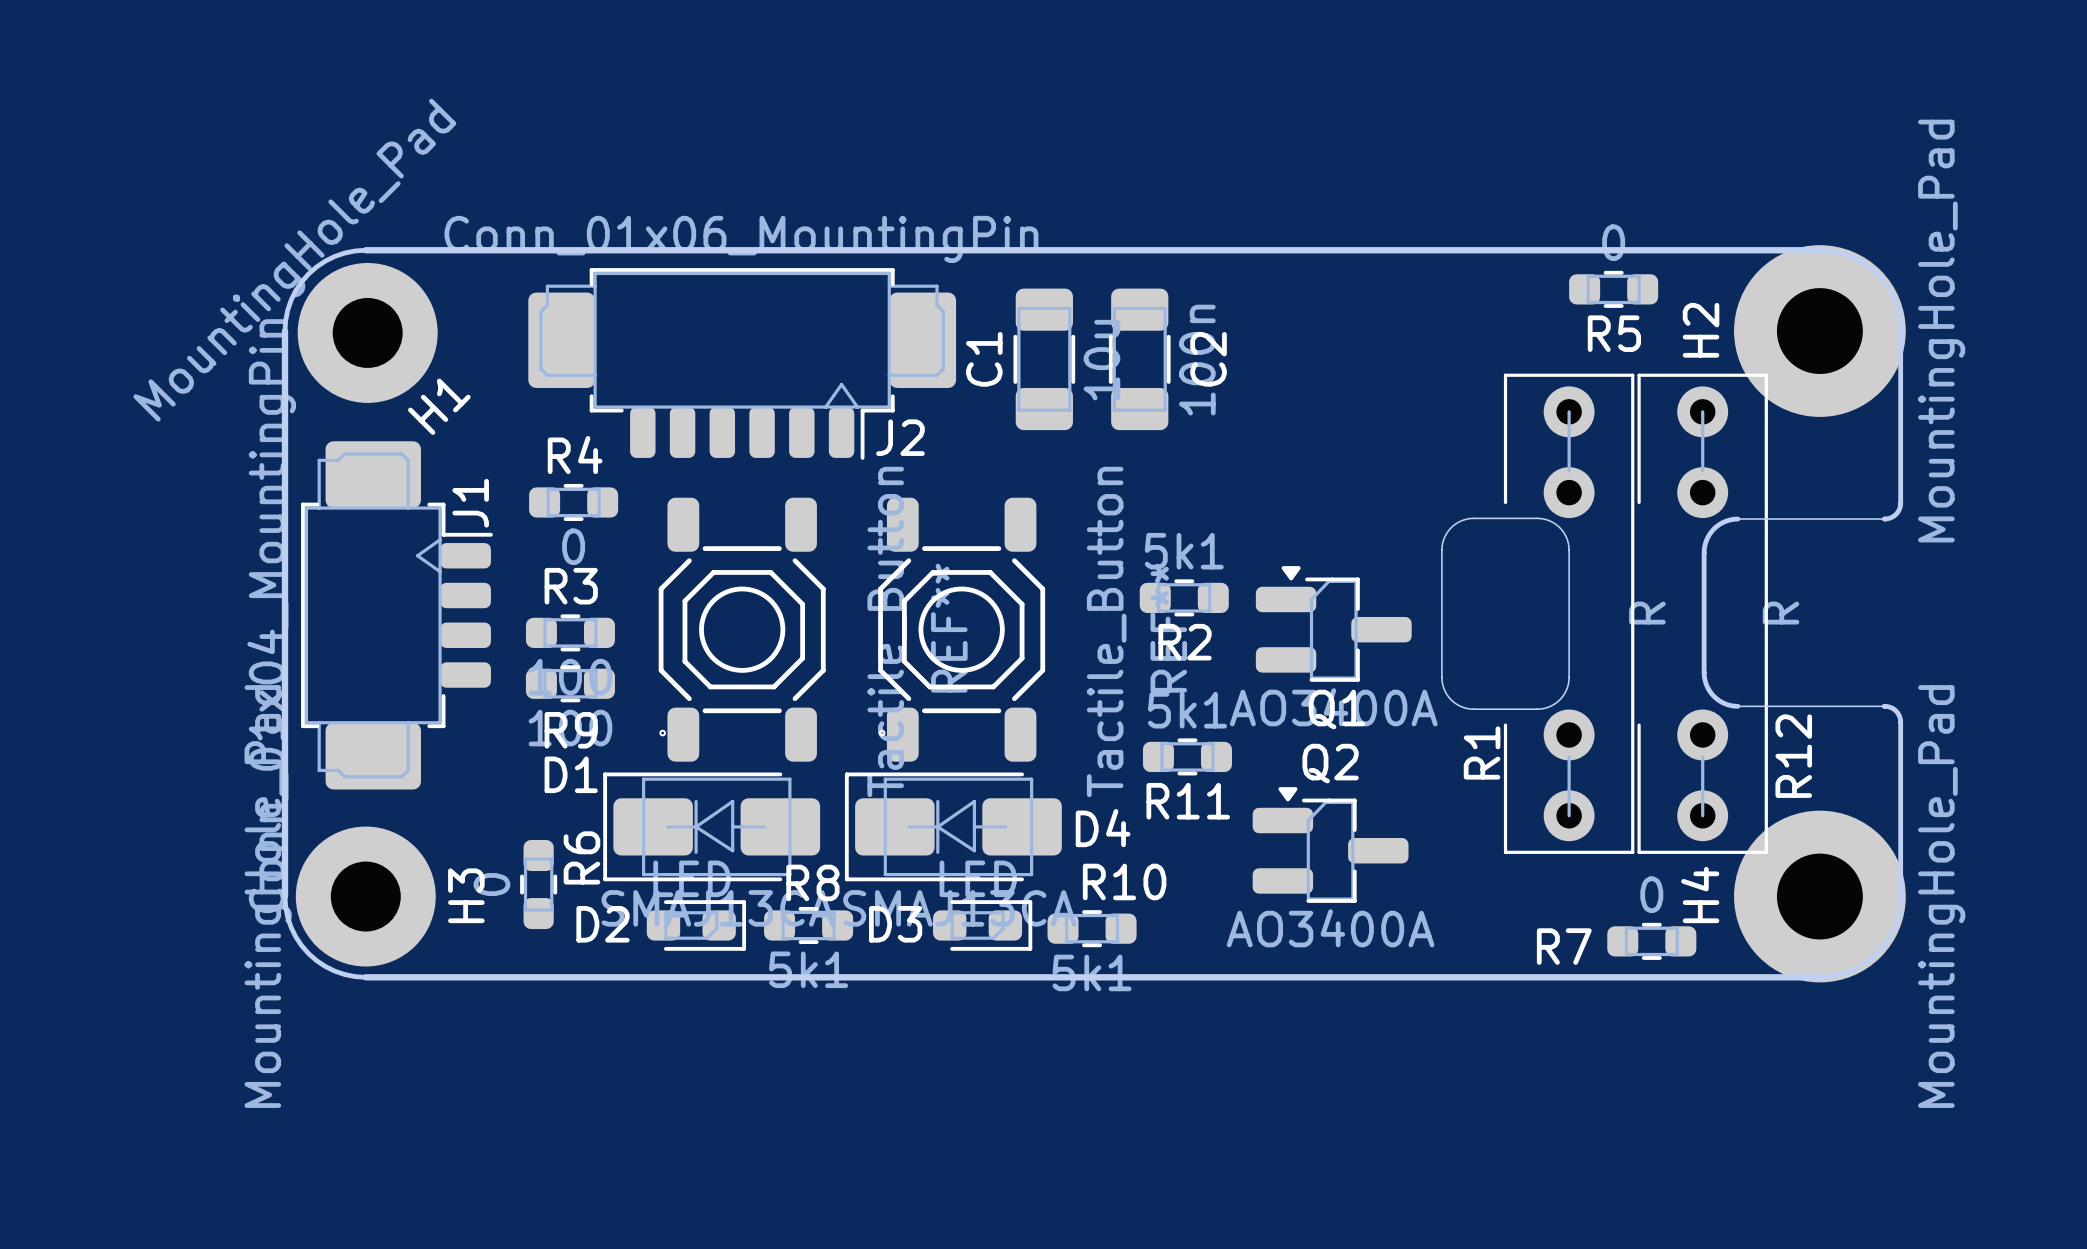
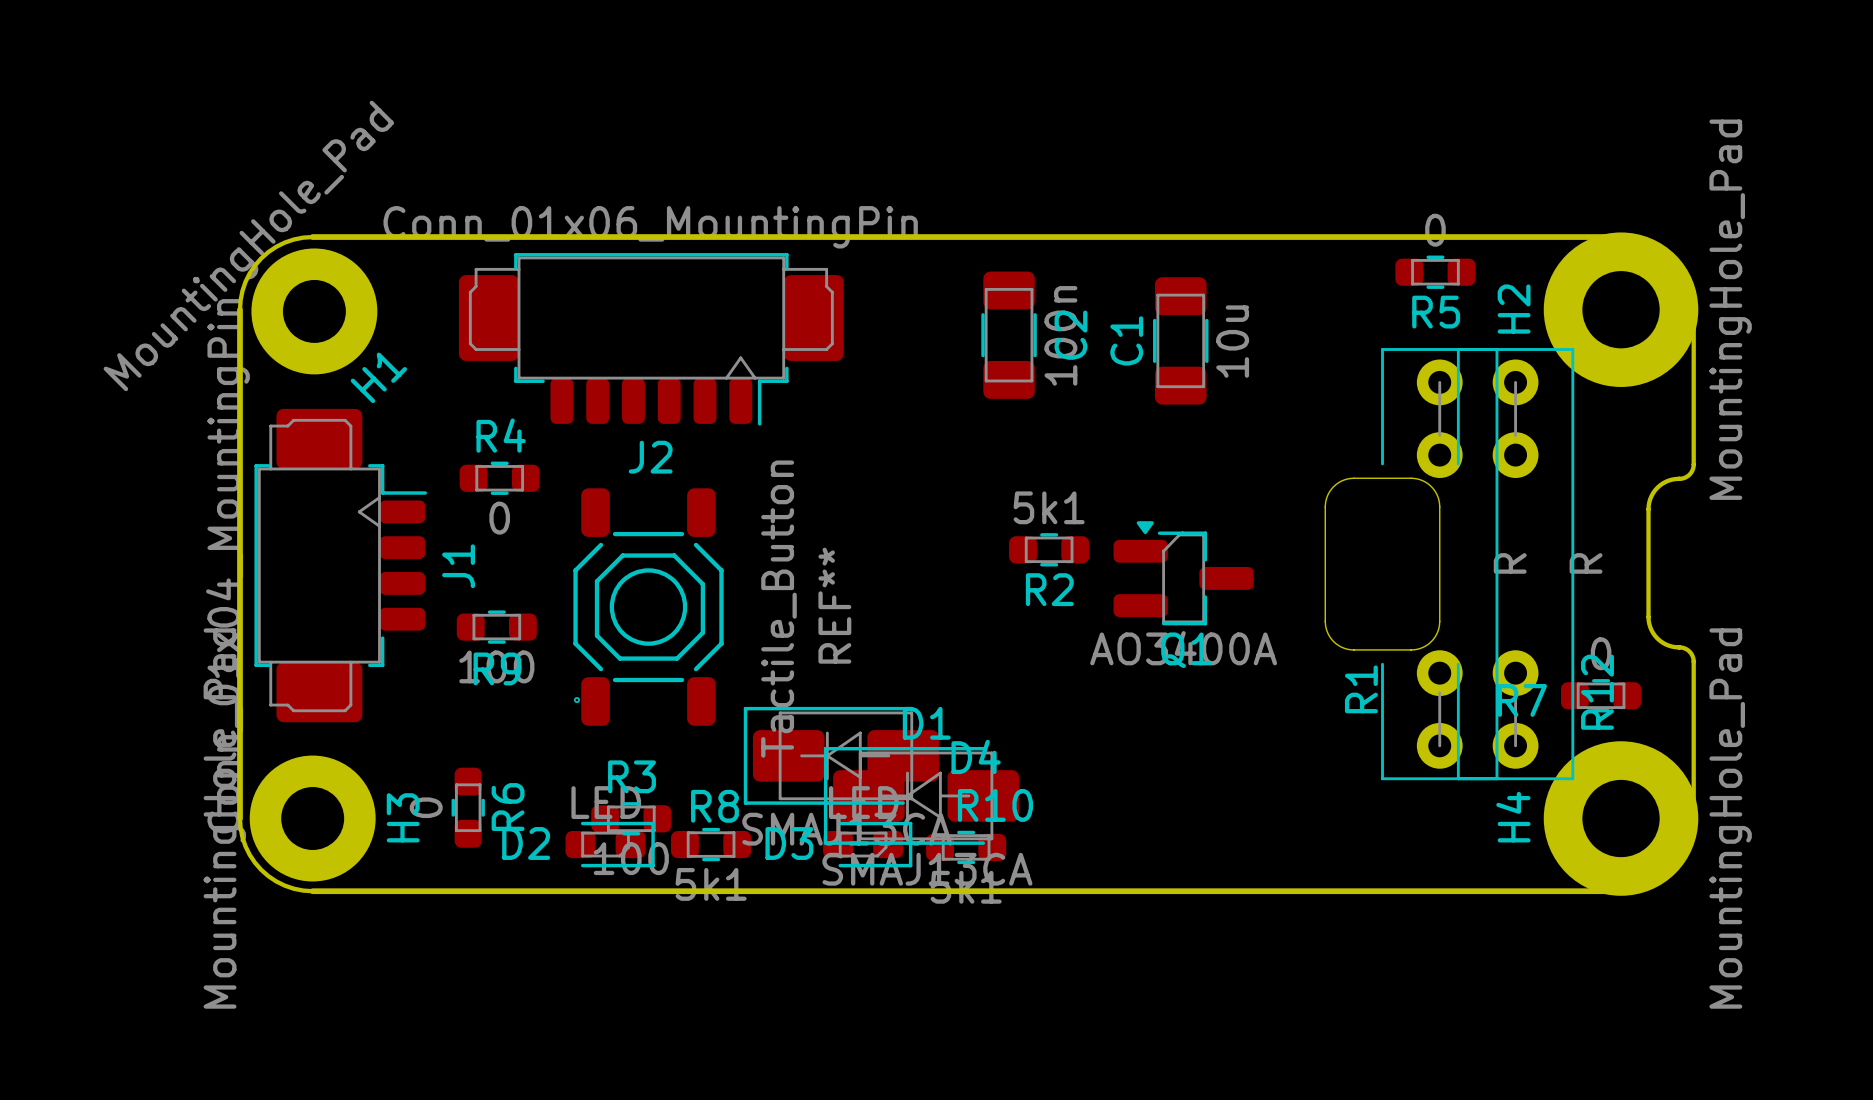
C1 position: (1044, 359) -> (1180, 340)
J2 name position: J2 (900, 437) -> J2 (650, 457)
R4 position: (573, 502) -> (499, 478)
J1 name position: J1 (470, 503) -> J1 (458, 566)
board edge: (1884, 519) (1730, 519) (1719, 524) (1711, 531) (1706, 541) (1704, 552) (1704, 676) (1709, 690) (1716, 698) (1726, 704) (1737, 706) (1884, 706) -> (1678, 478) (1665, 481) (1657, 487) (1651, 496) (1648, 509) (1649, 623) (1653, 633) (1659, 640) (1668, 645) (1678, 647)
R1 position: (1537, 613) -> (1411, 564)
part position: (742, 629) -> (648, 607)
part: Tactile_Button (961, 629) -> none
R3 position: (570, 632) -> (631, 818)
R11: 5k1 (1187, 756) -> none
D1 name position: D1 (571, 774) -> D1 (926, 723)
D1 position: (711, 826) -> (921, 795)
Q2: AO3400A (1330, 845) -> none
R6 name position: R6 (581, 857) -> R6 (508, 807)
R7 position: (1651, 941) -> (1601, 695)

